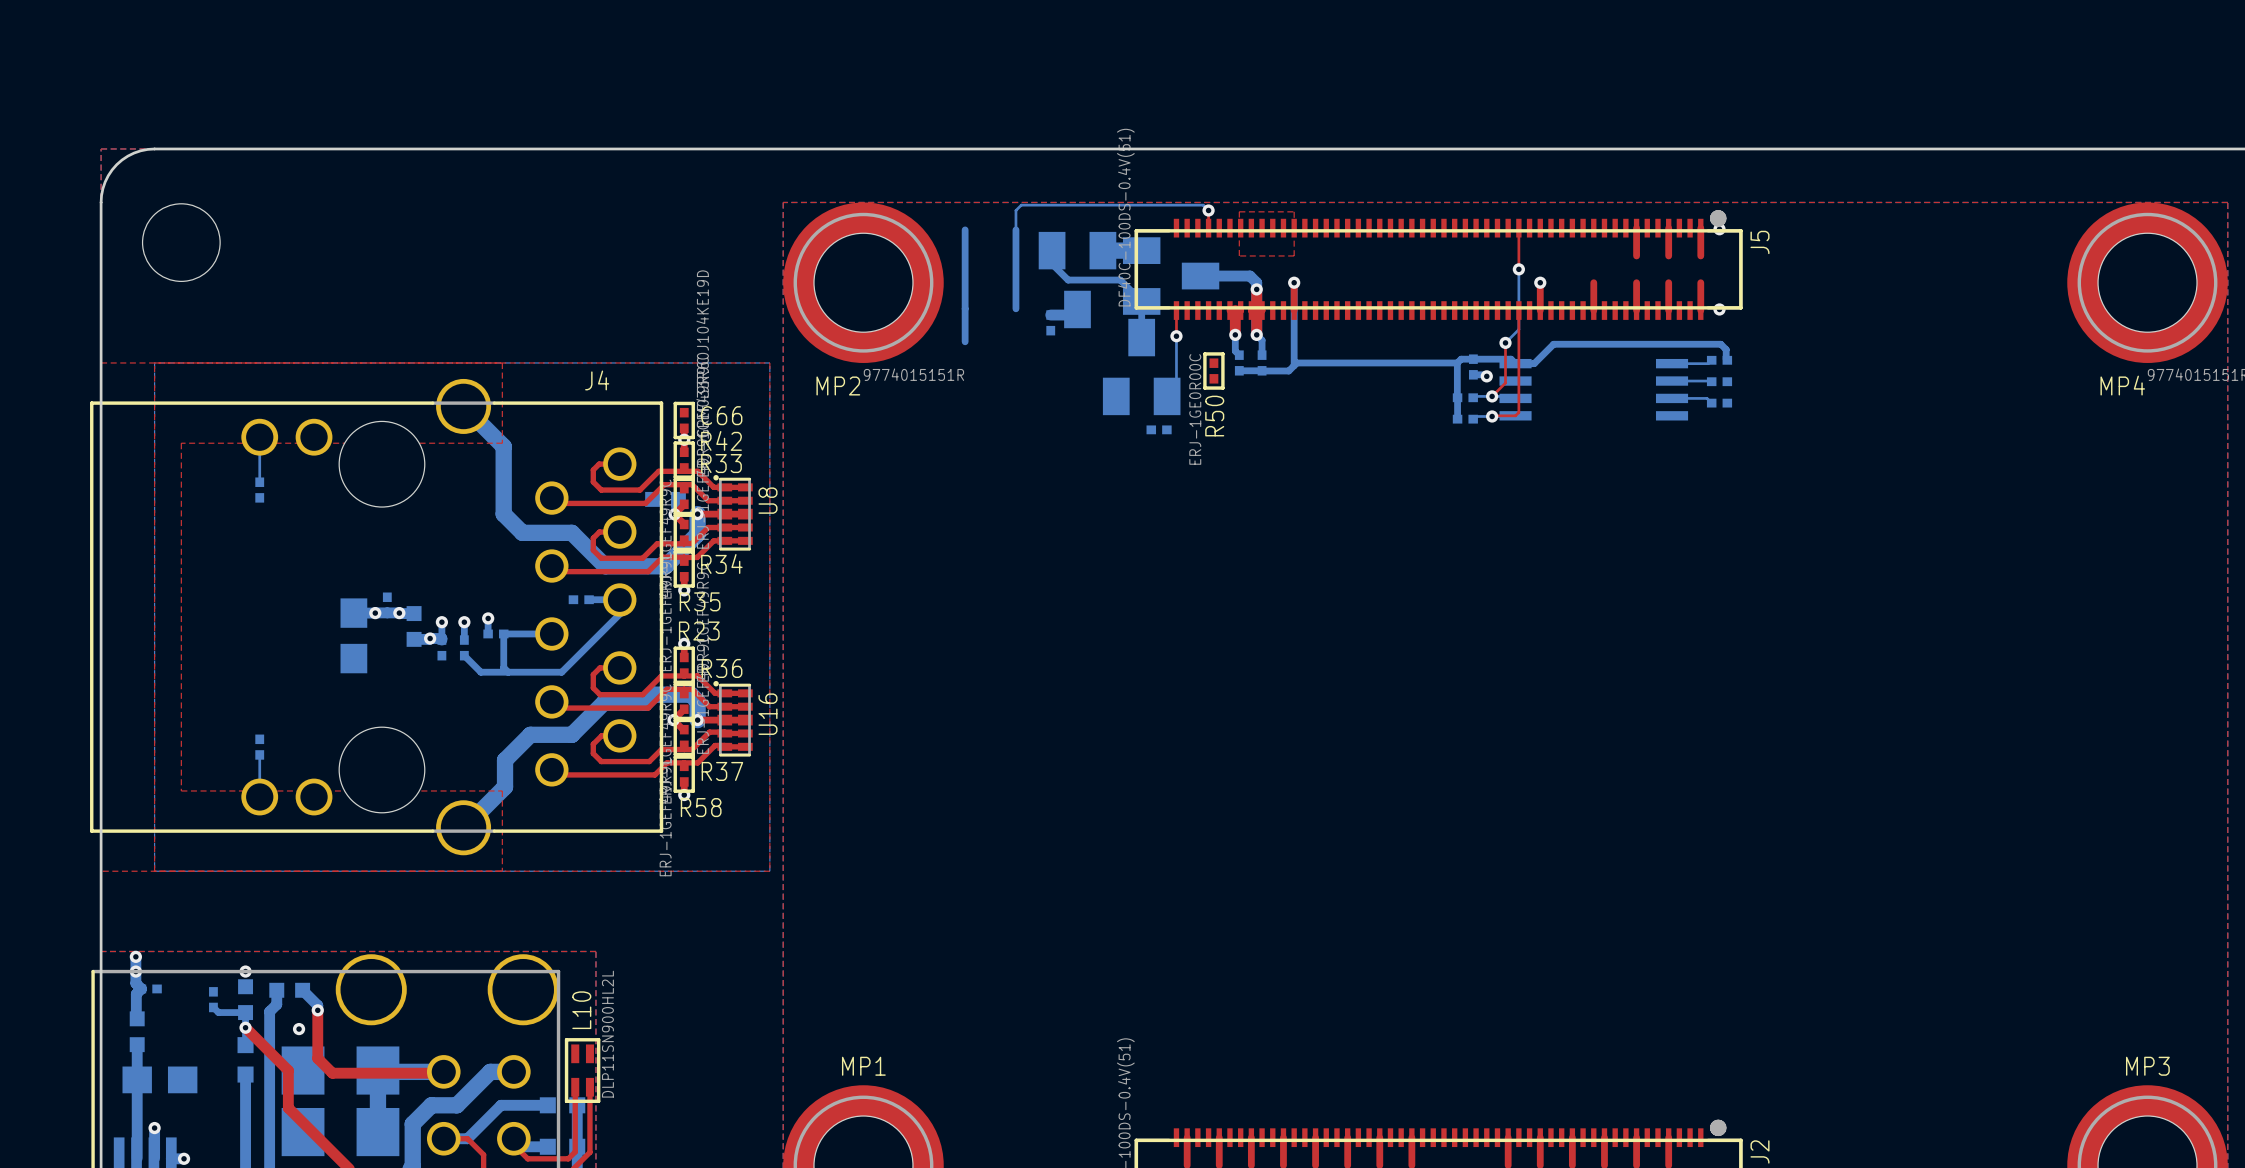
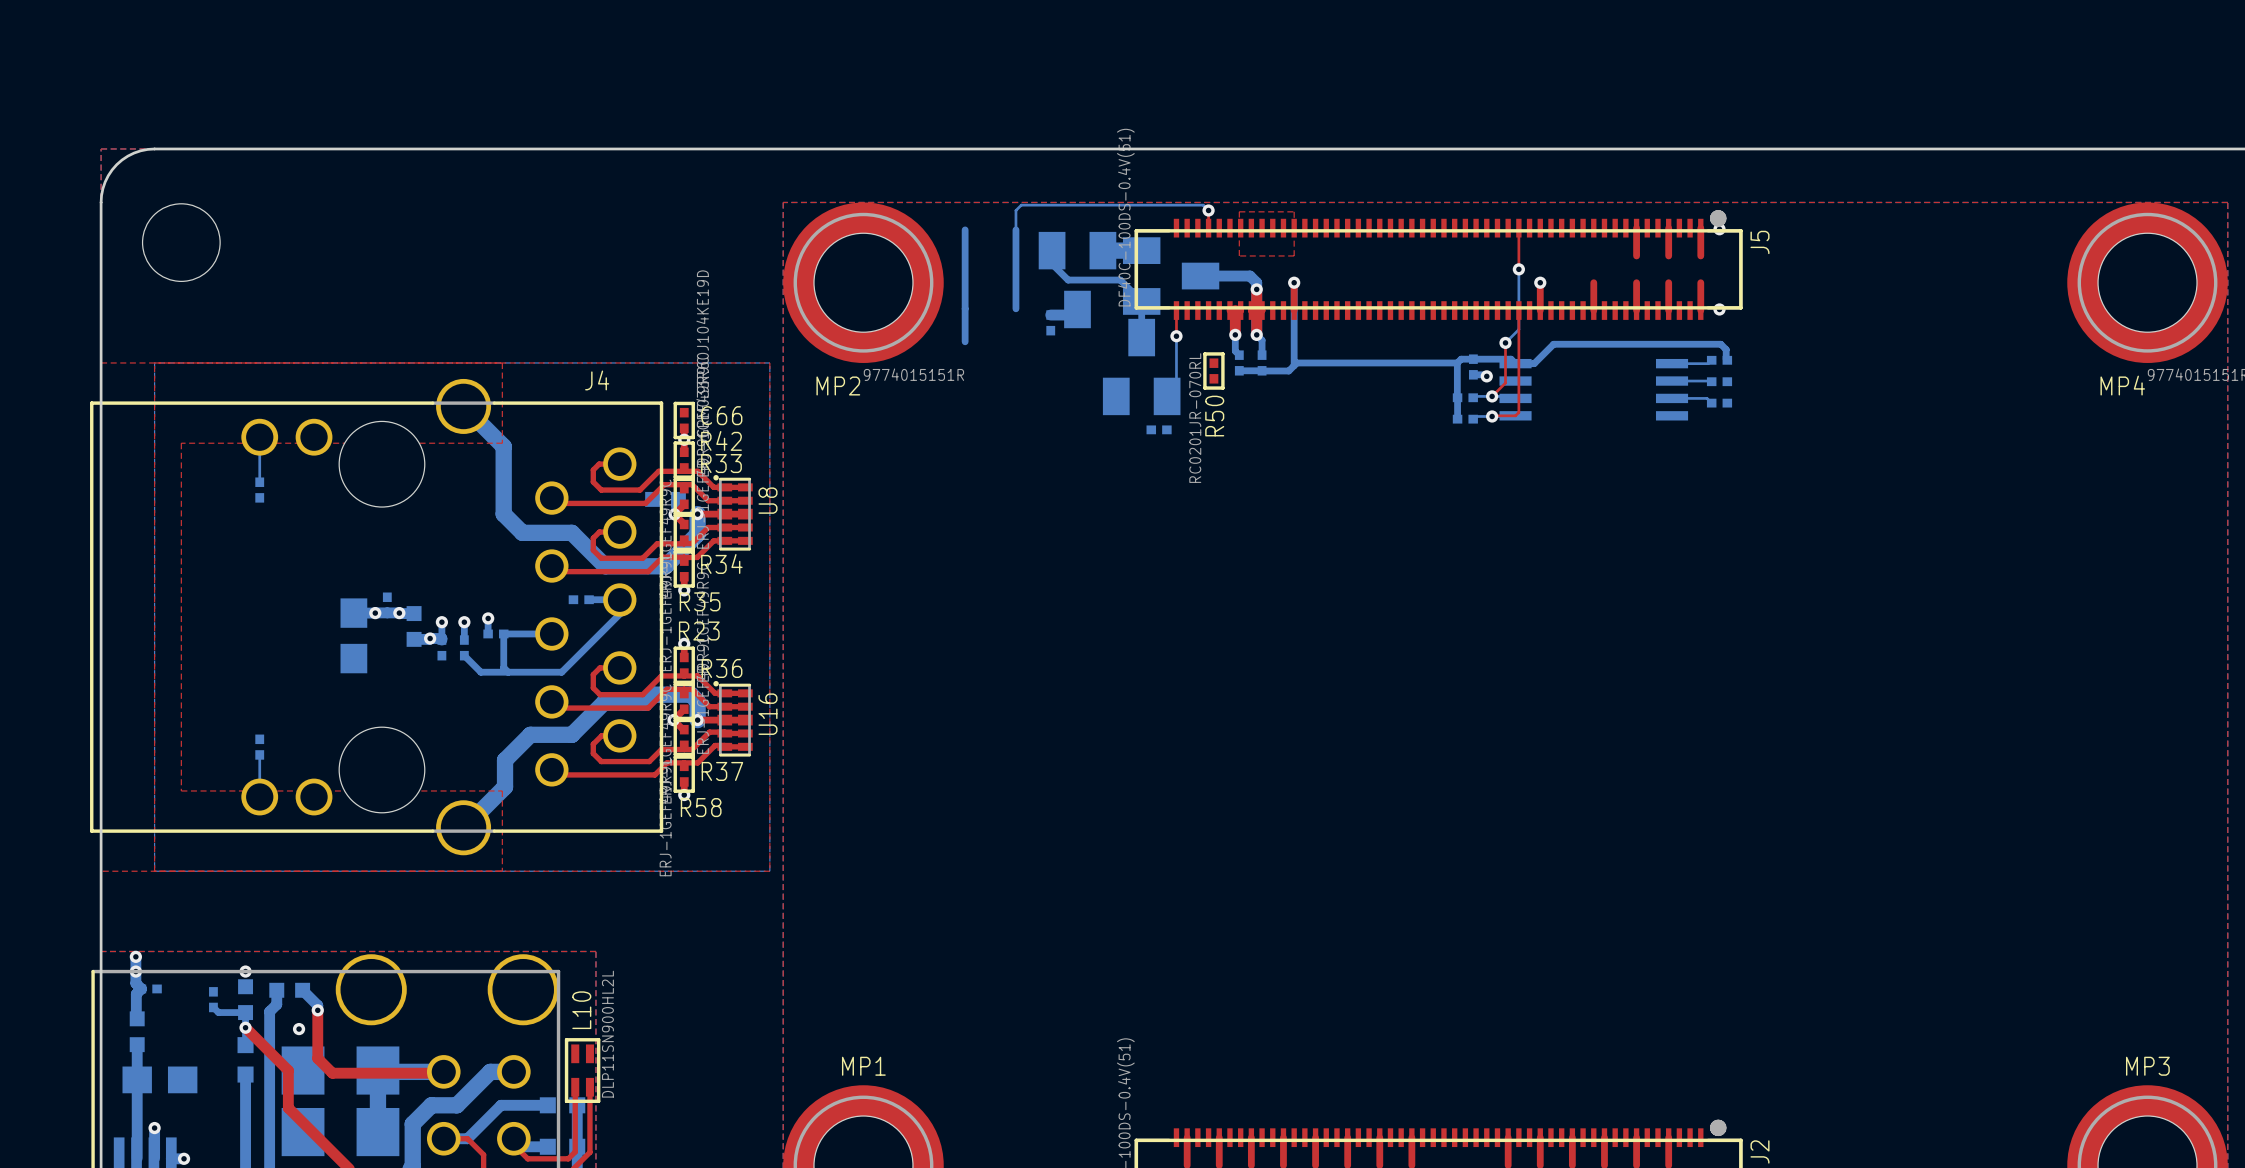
R50 value: ERJ-1GE0R00C (1195, 409) -> RC0201JR-070RL (1195, 418)

